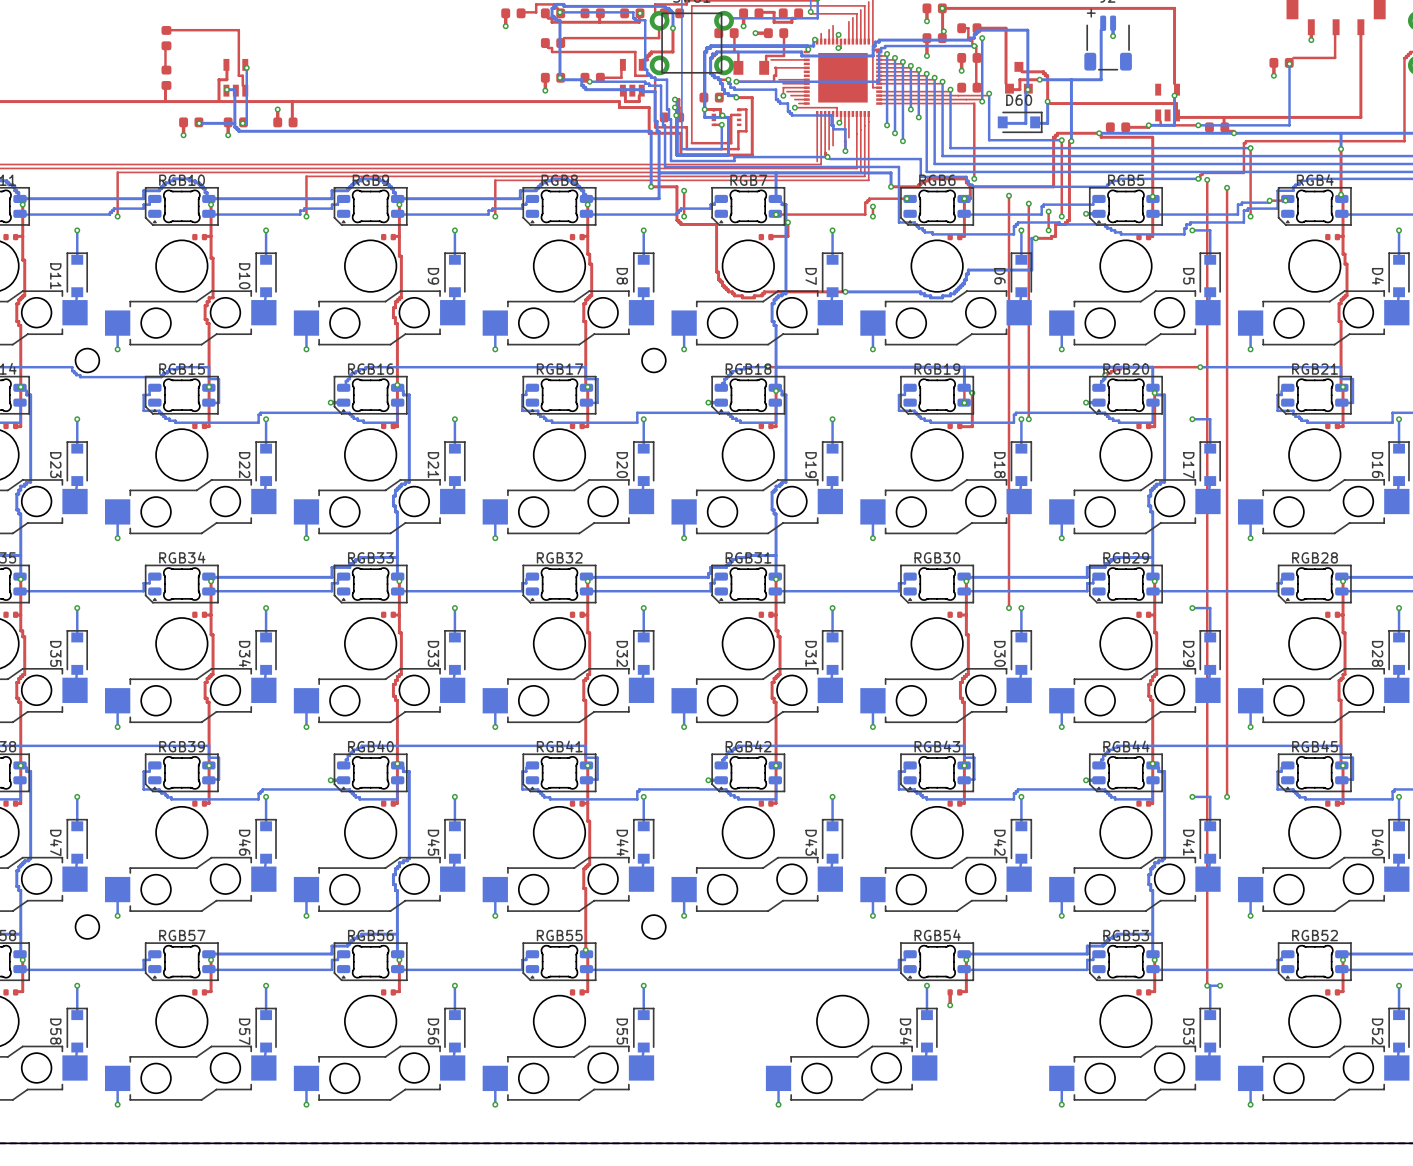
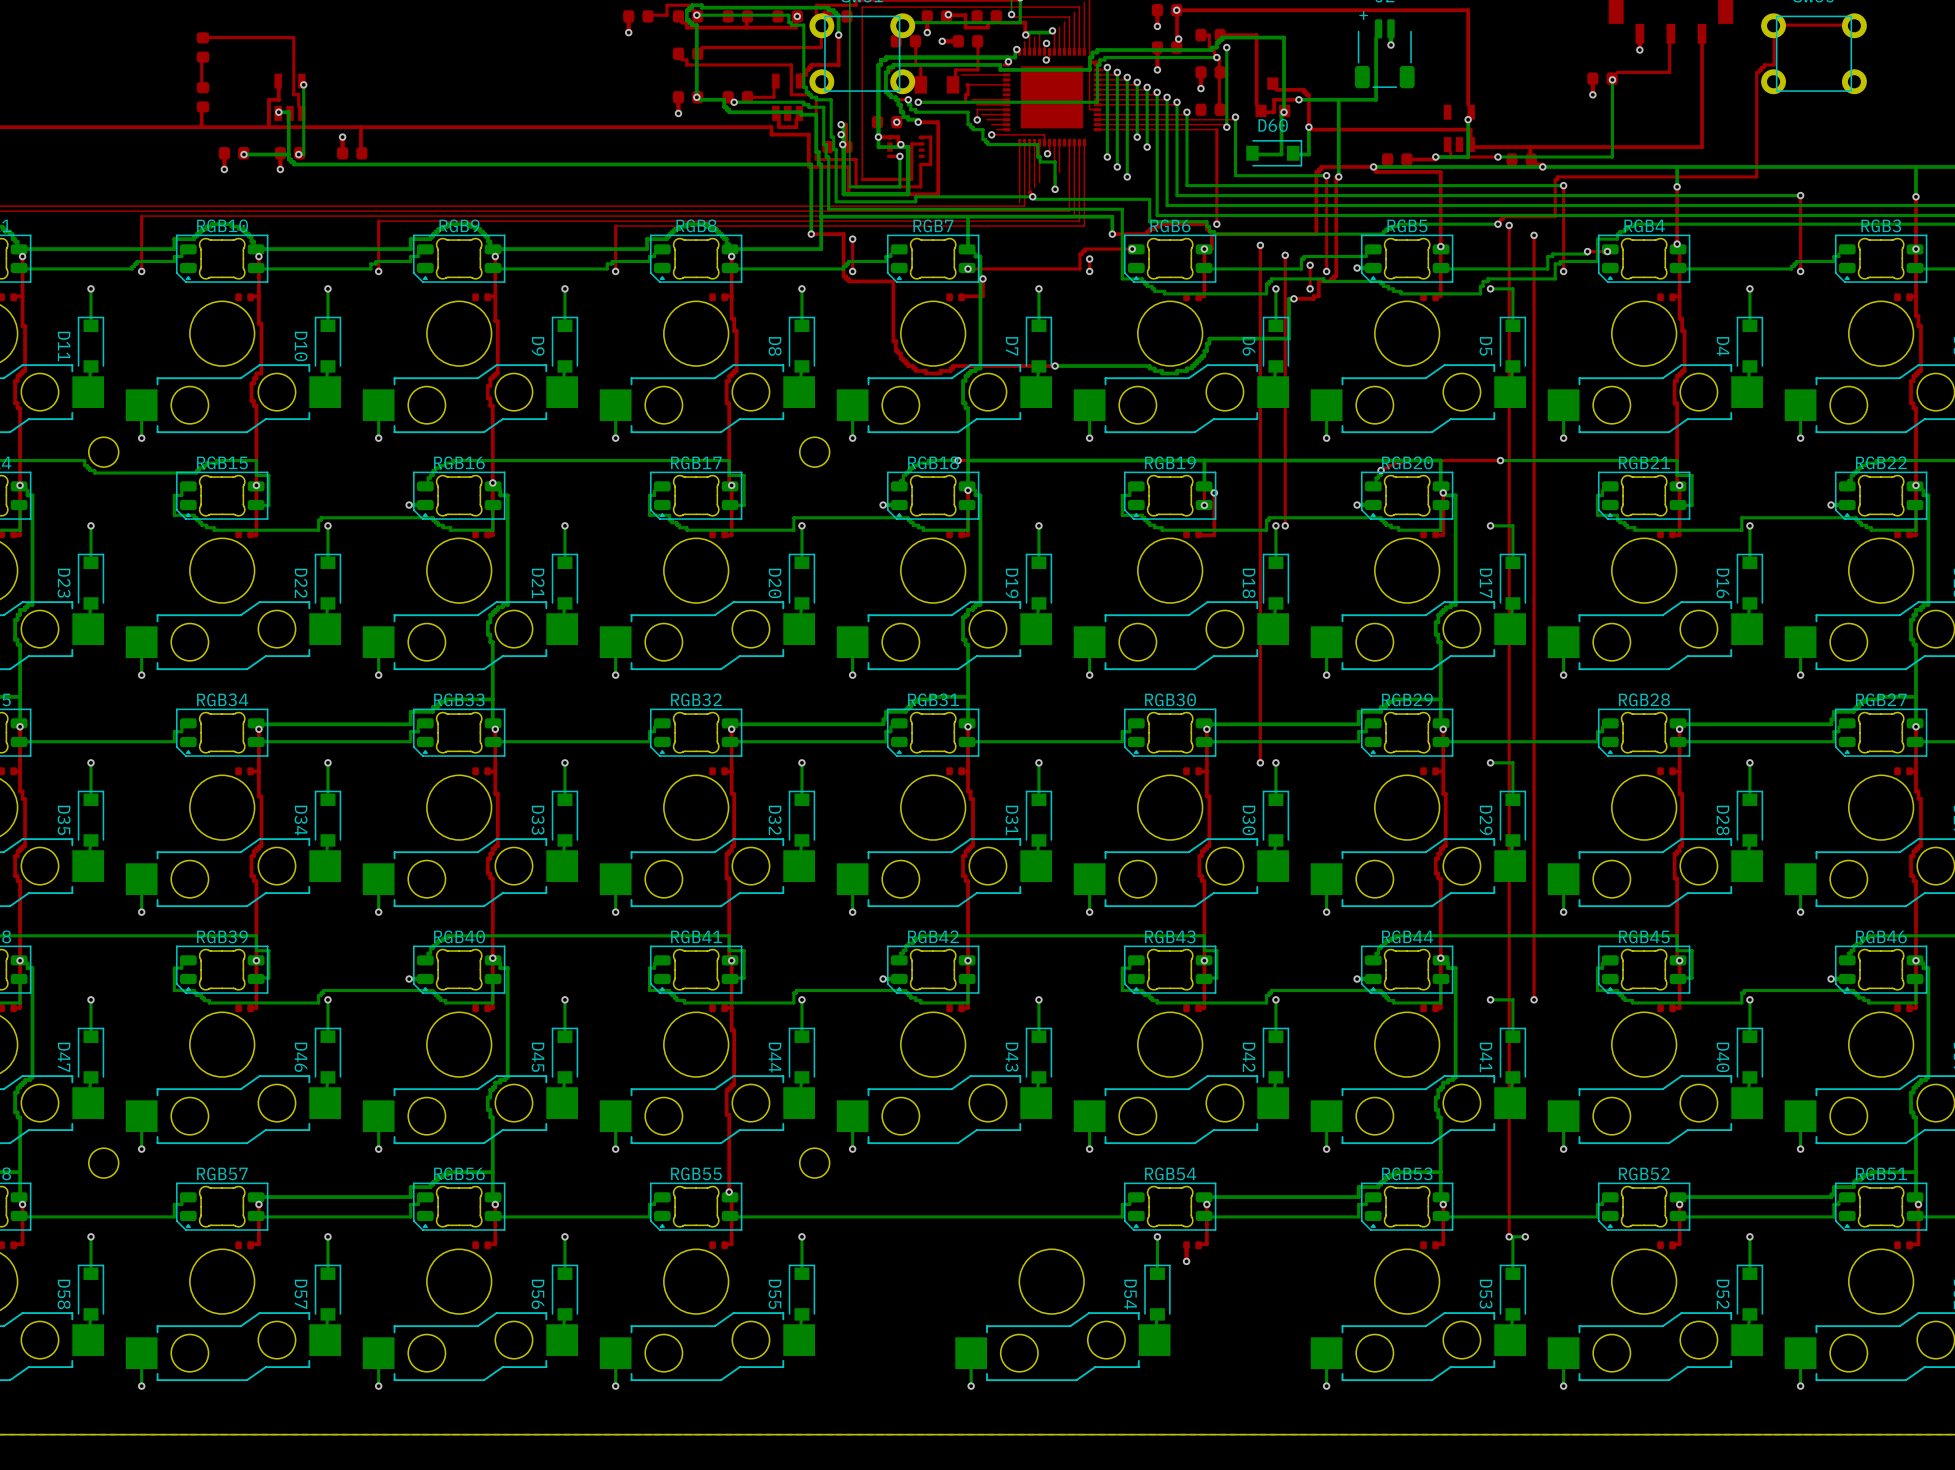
via: none -> (948, 14)
top track: none -> (1000, 22) (1025, 22) (1025, 32)
top track: none -> (1052, 30) (1054, 30) (1054, 51)
via: none -> (1052, 30)
bottom track: none -> (1050, 32) (1027, 32)
top track: none -> (1025, 34) (1029, 34) (1029, 51)
via: none -> (1025, 34)

